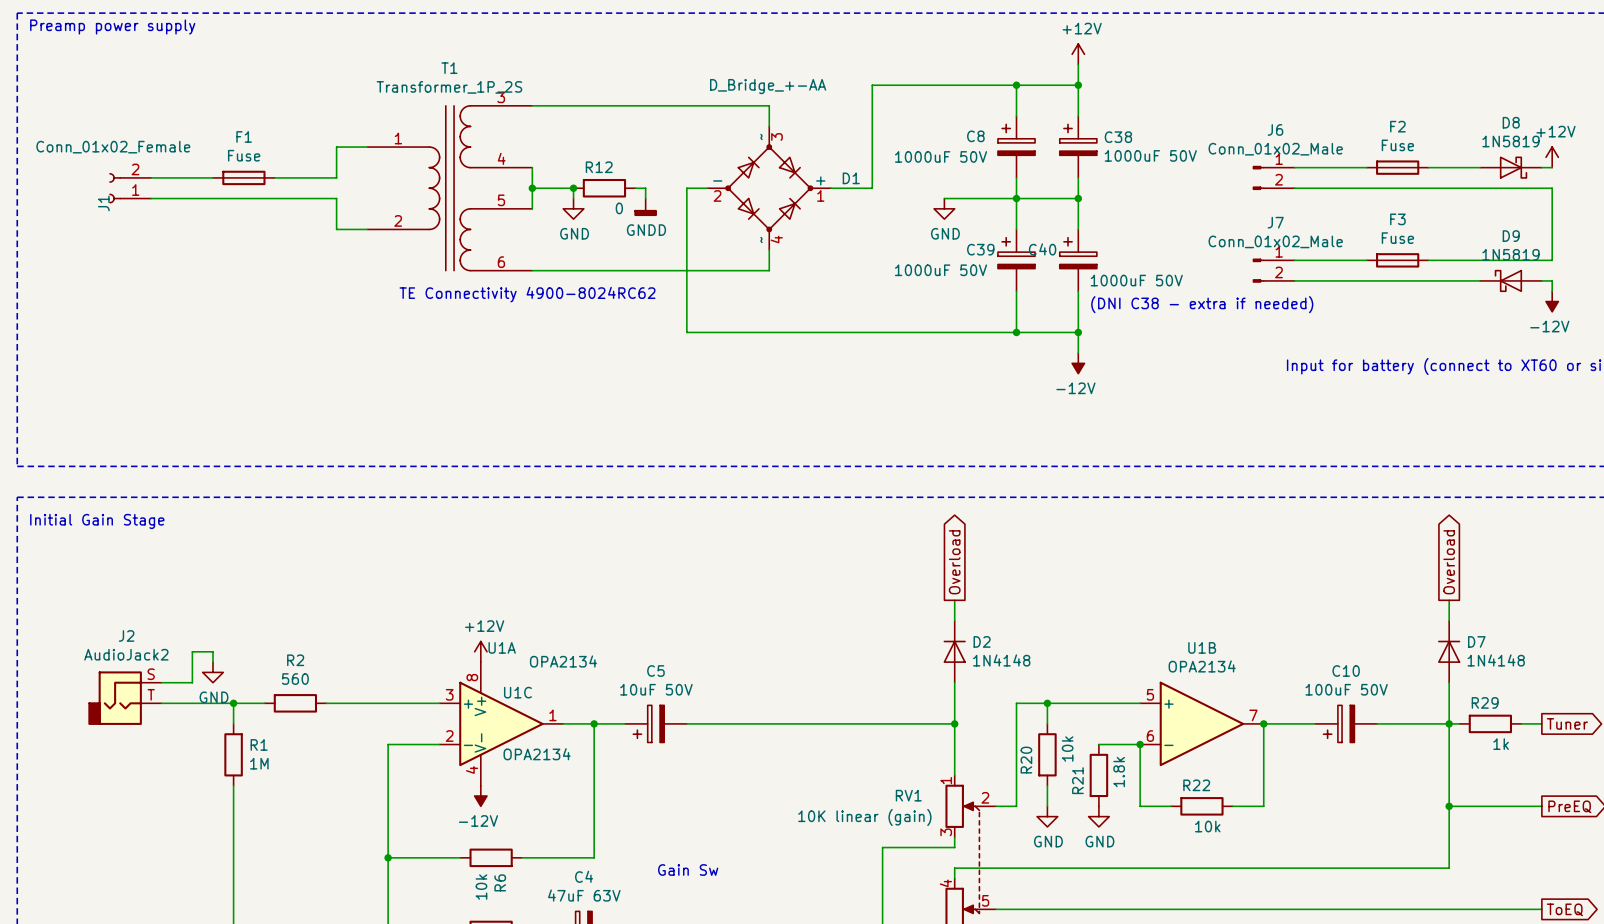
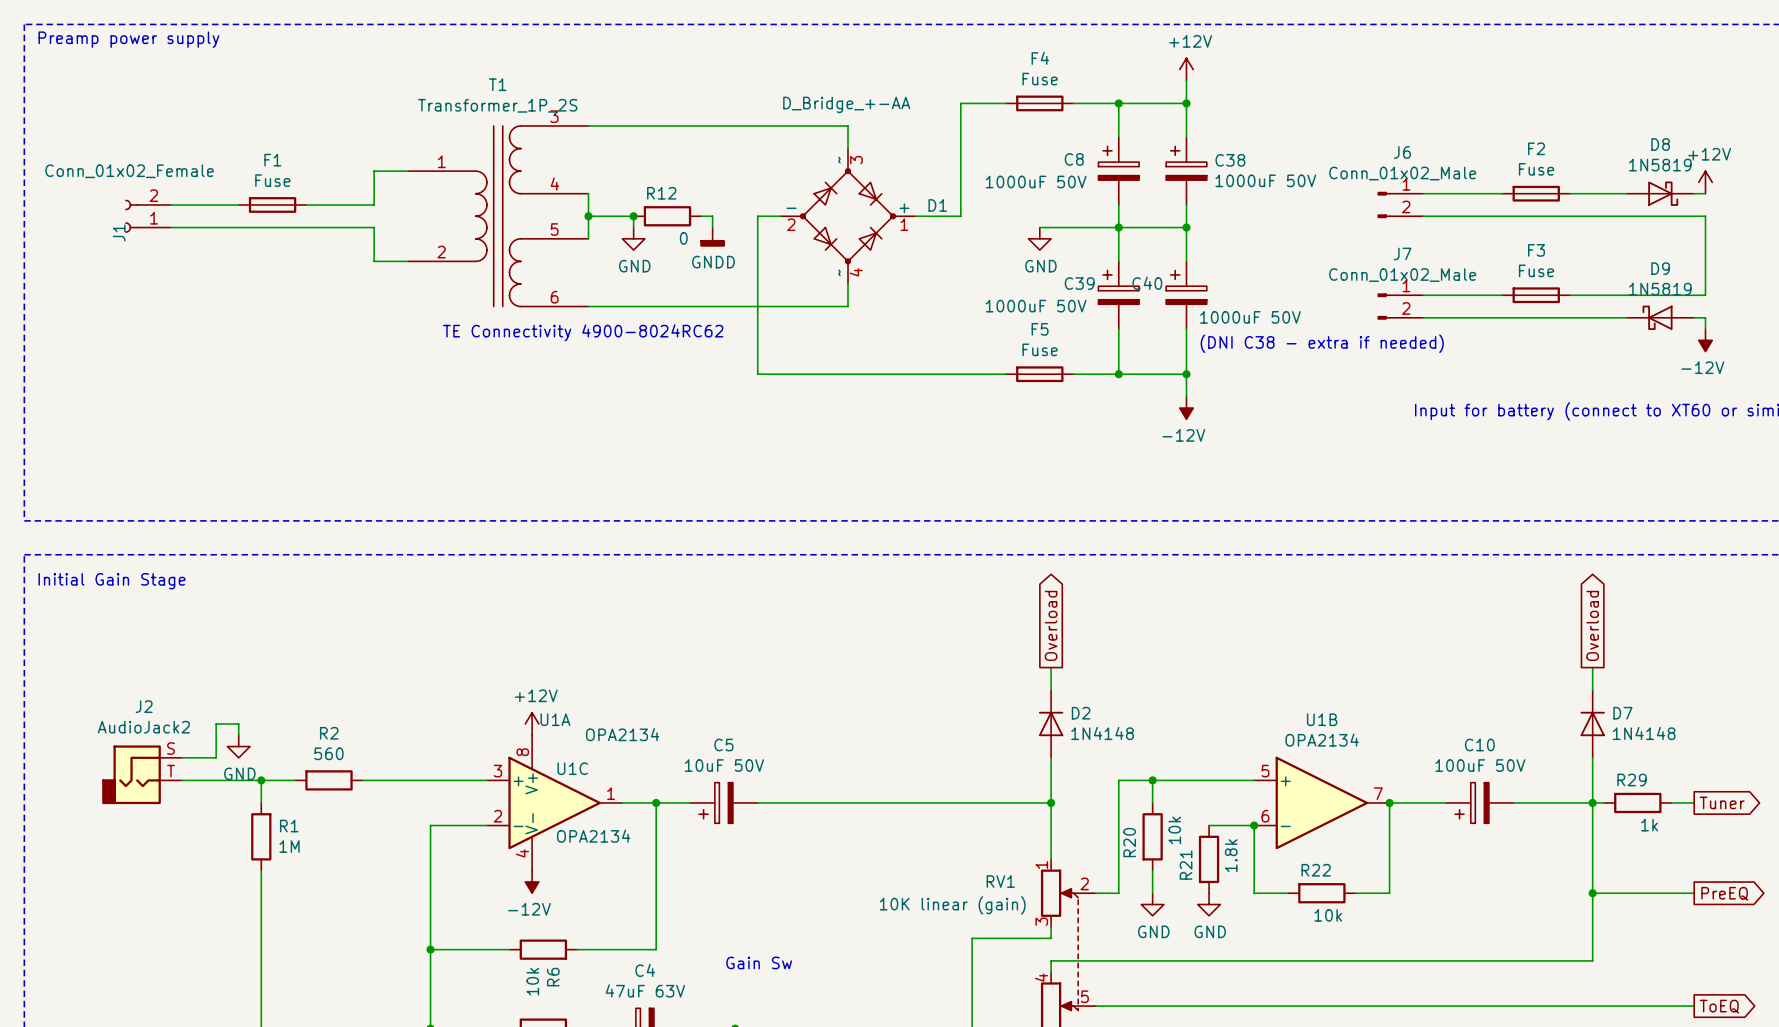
F4: none -> Fuse (1039, 103)
F5: none -> Fuse (1039, 374)

